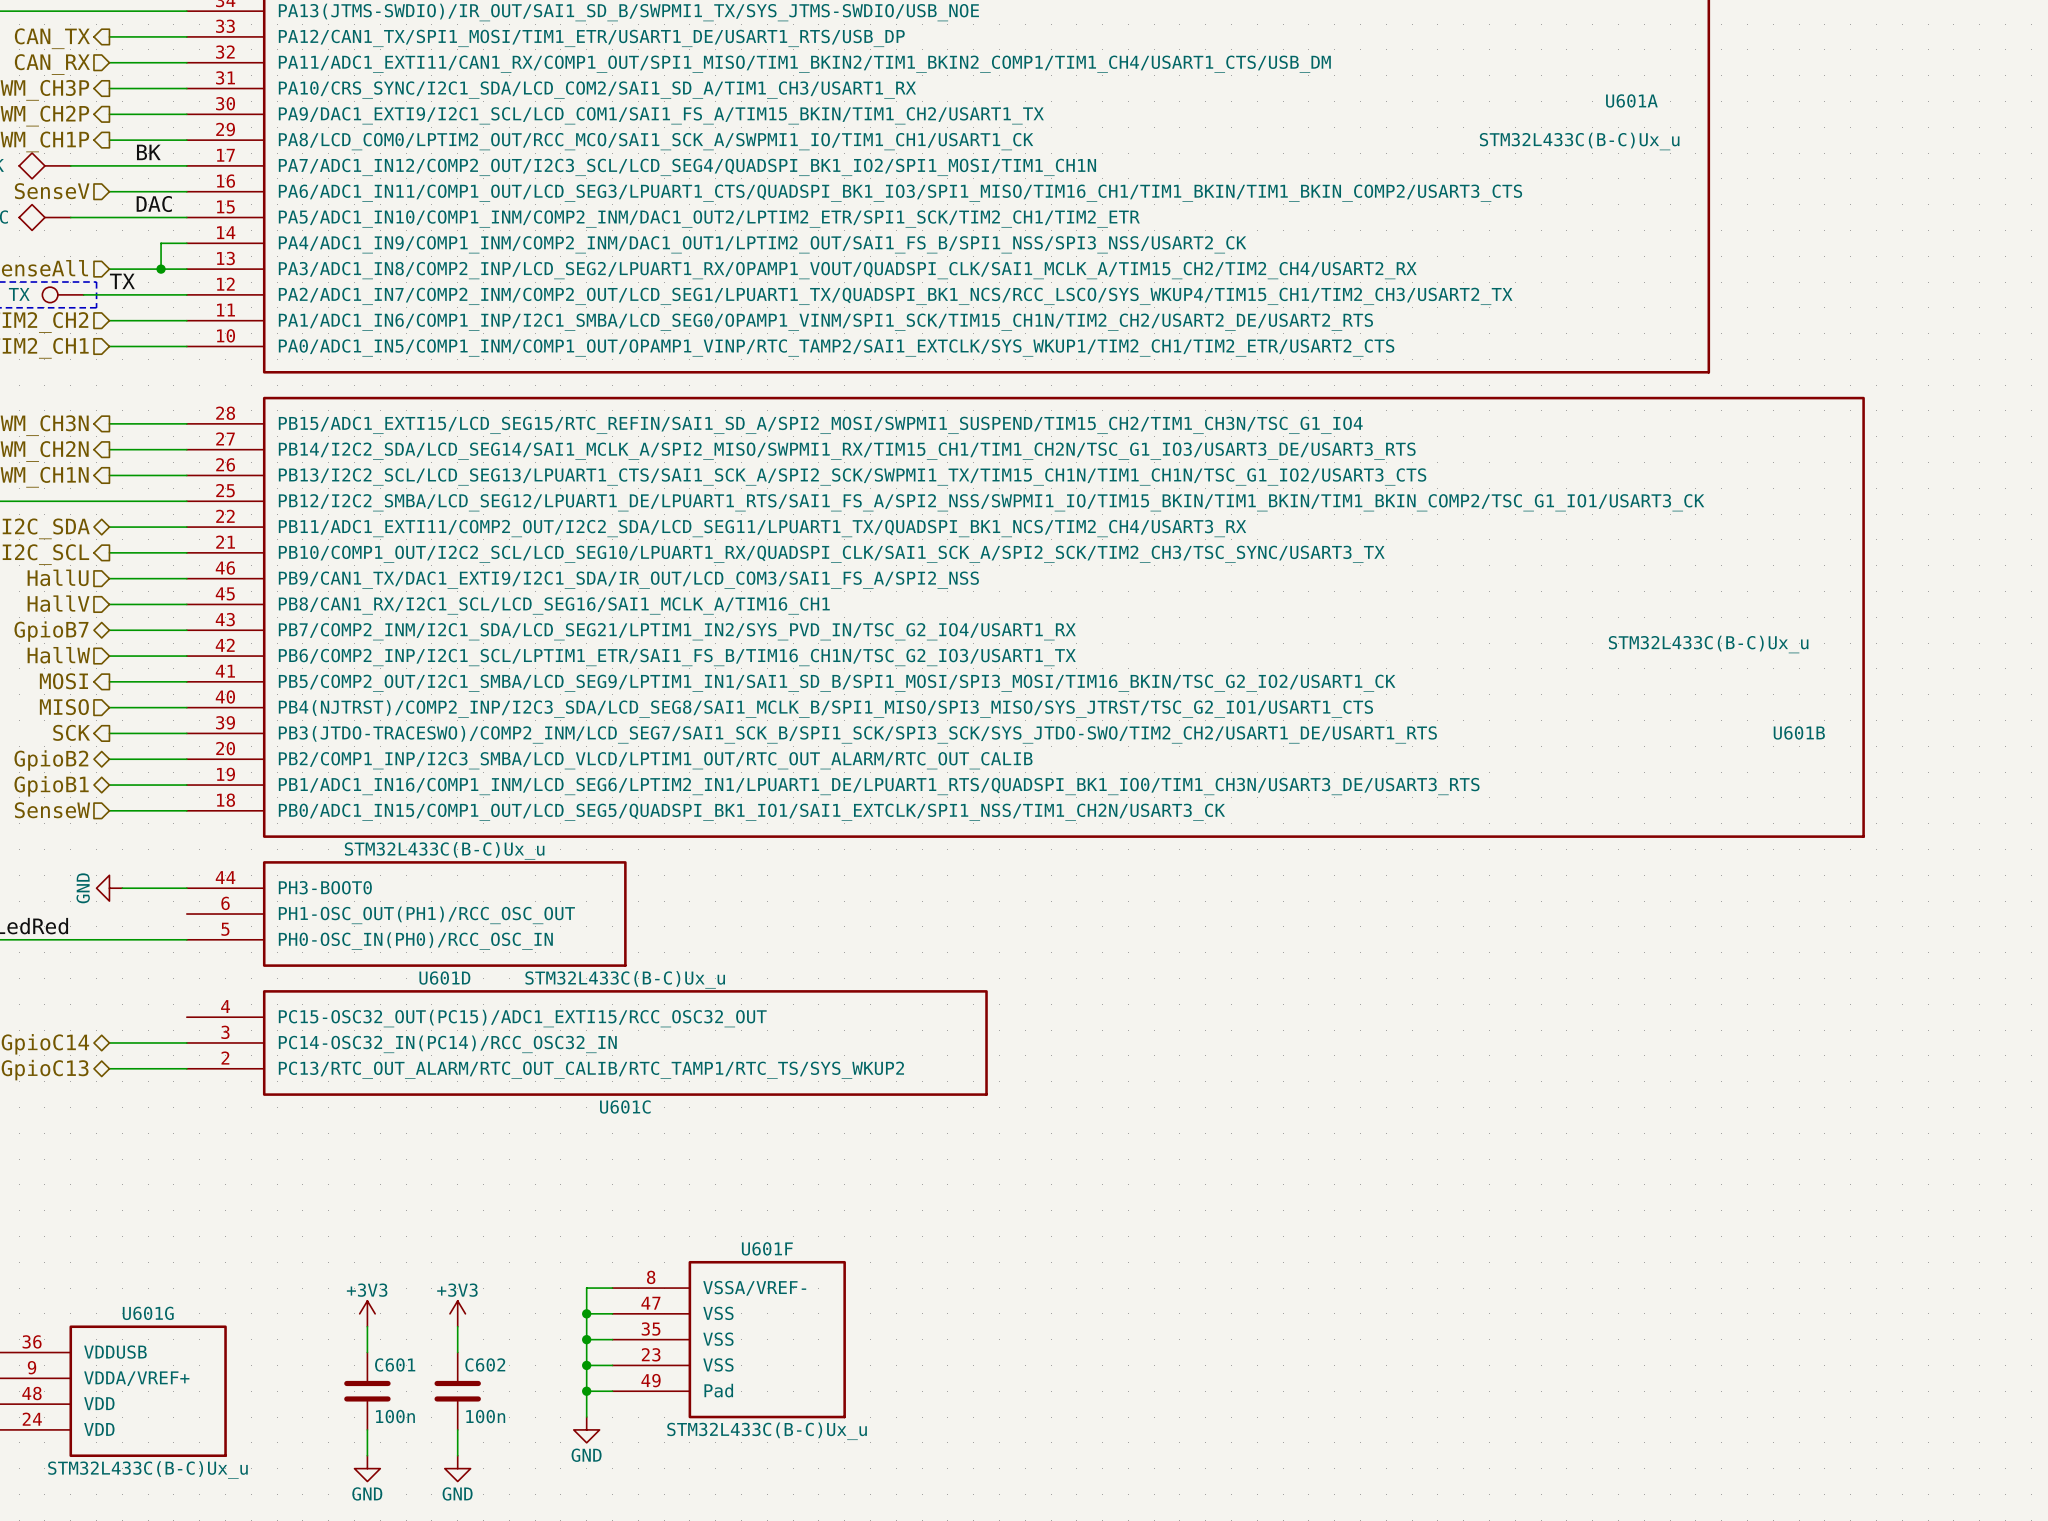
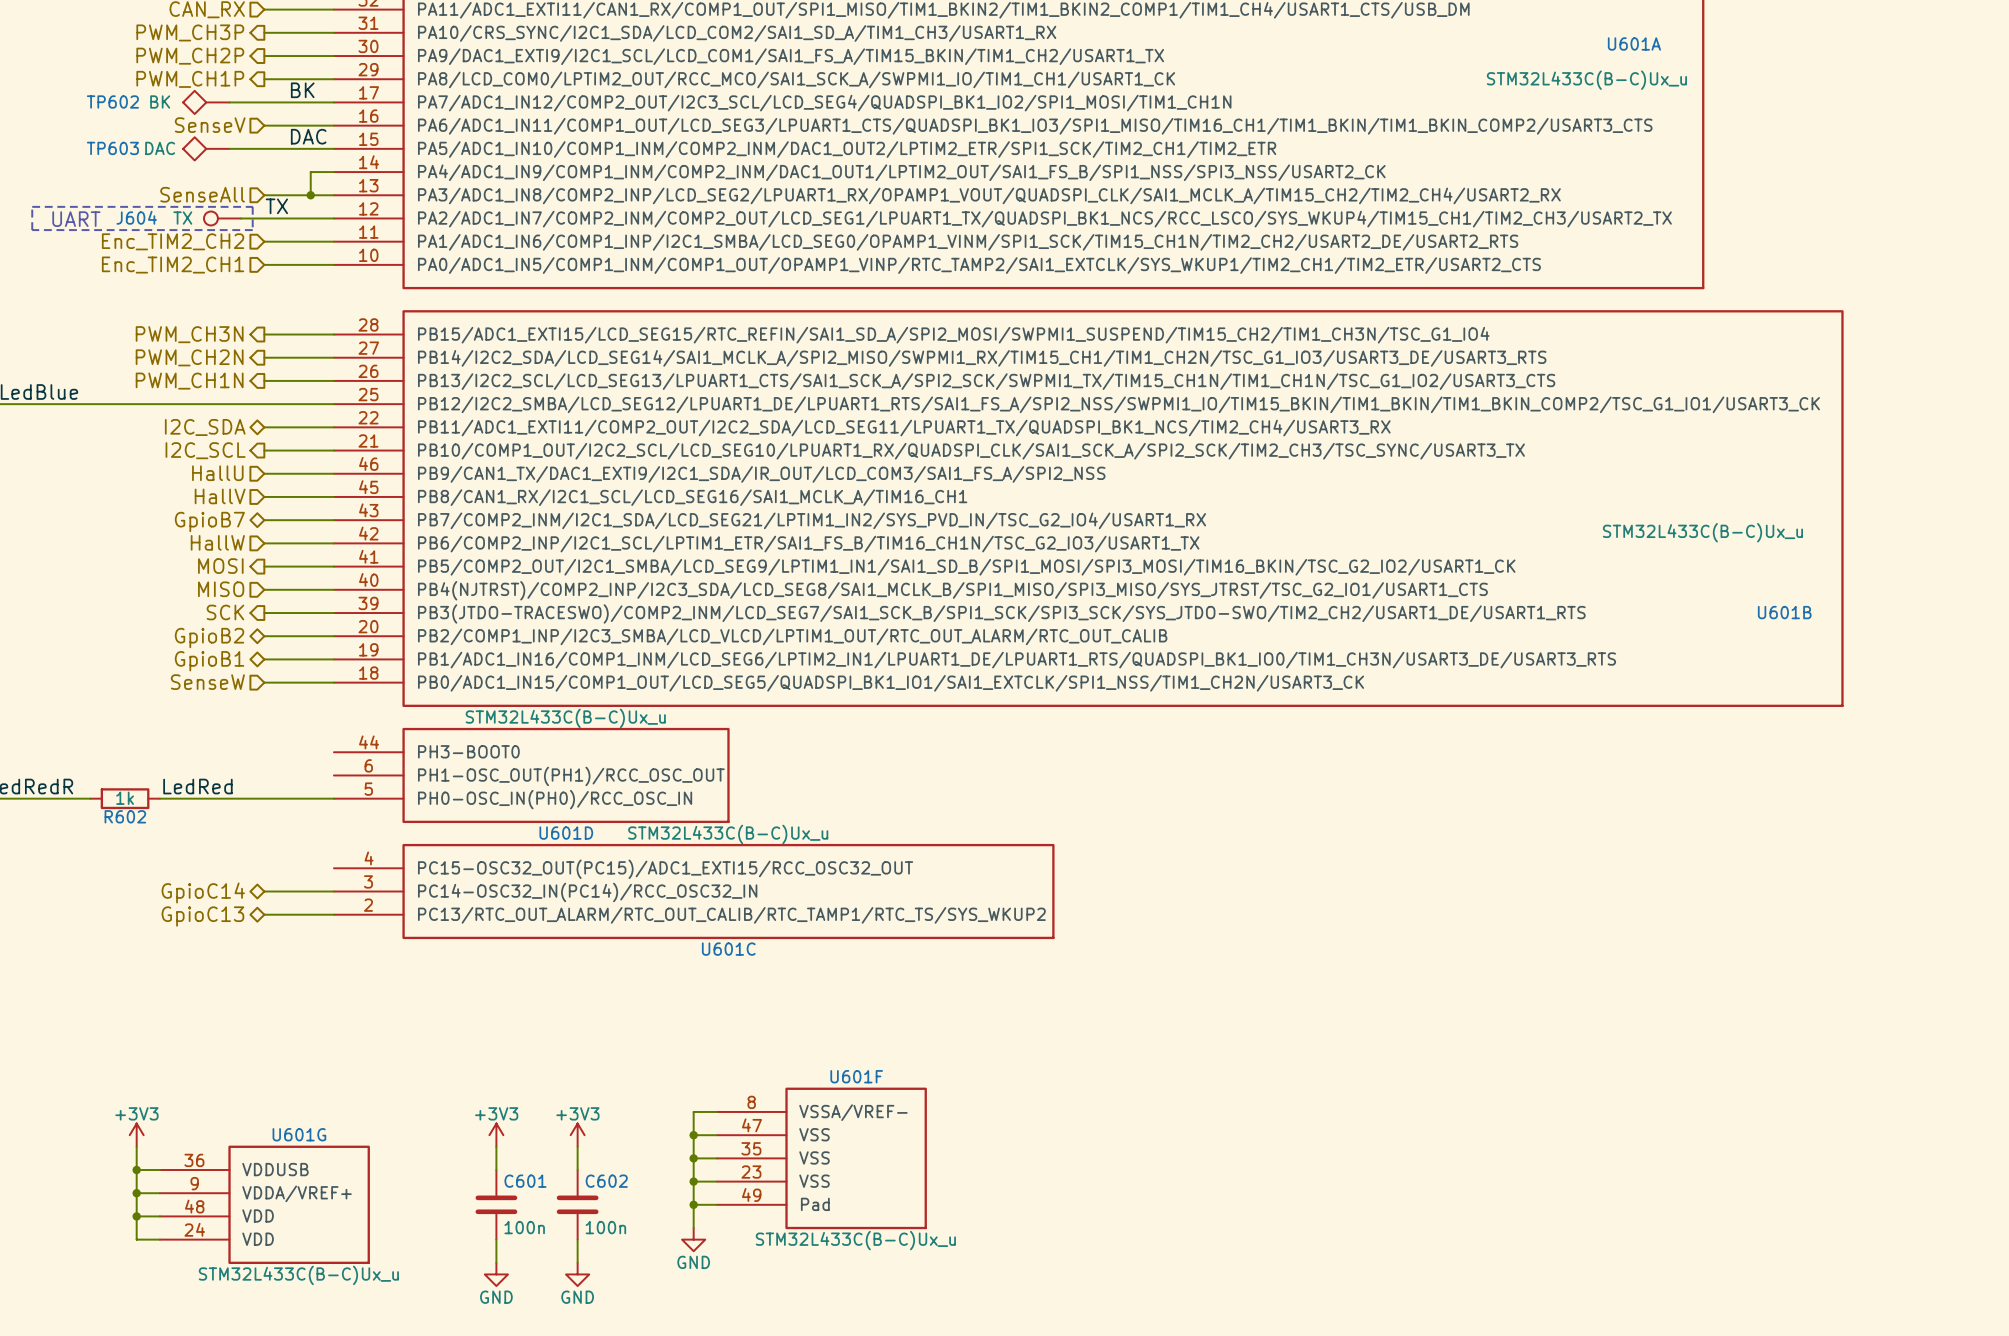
power symbol: GND (109, 888) -> none
wire: (122, 888) (186, 888) -> none

